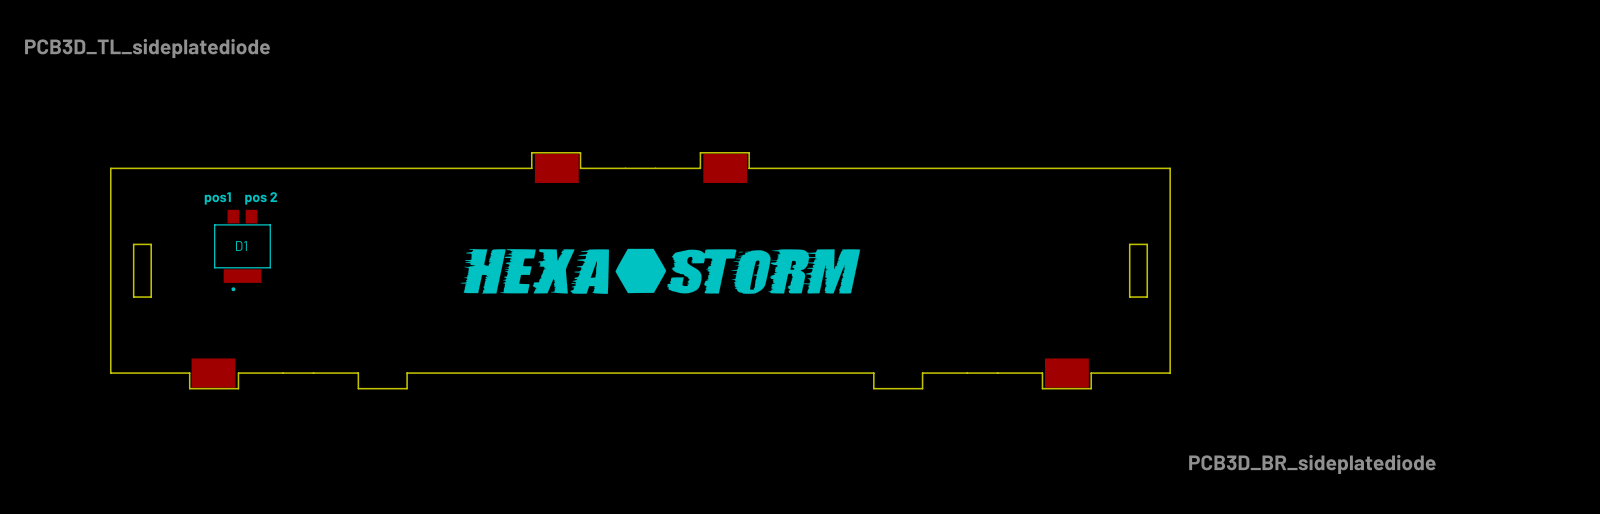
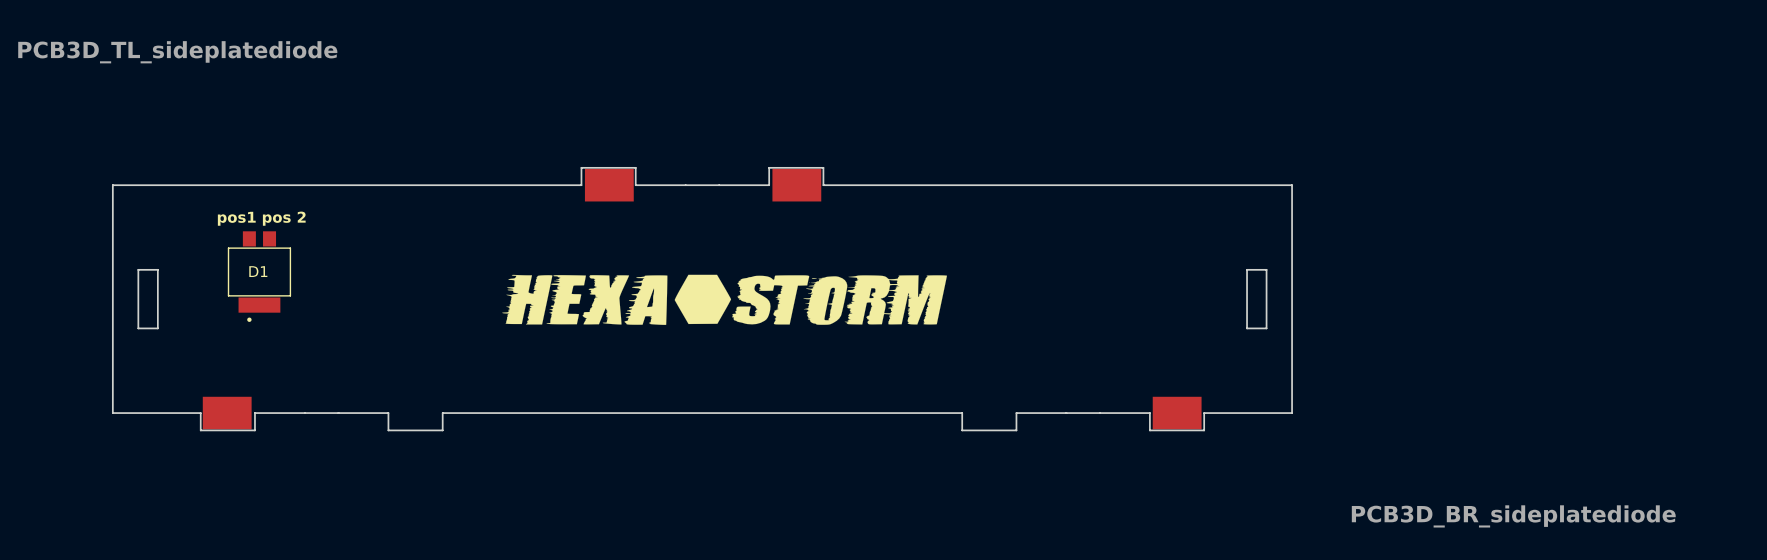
text position: PCB3D_BR_sideplatediode (1312, 464) -> PCB3D_BR_sideplatediode (1513, 516)

